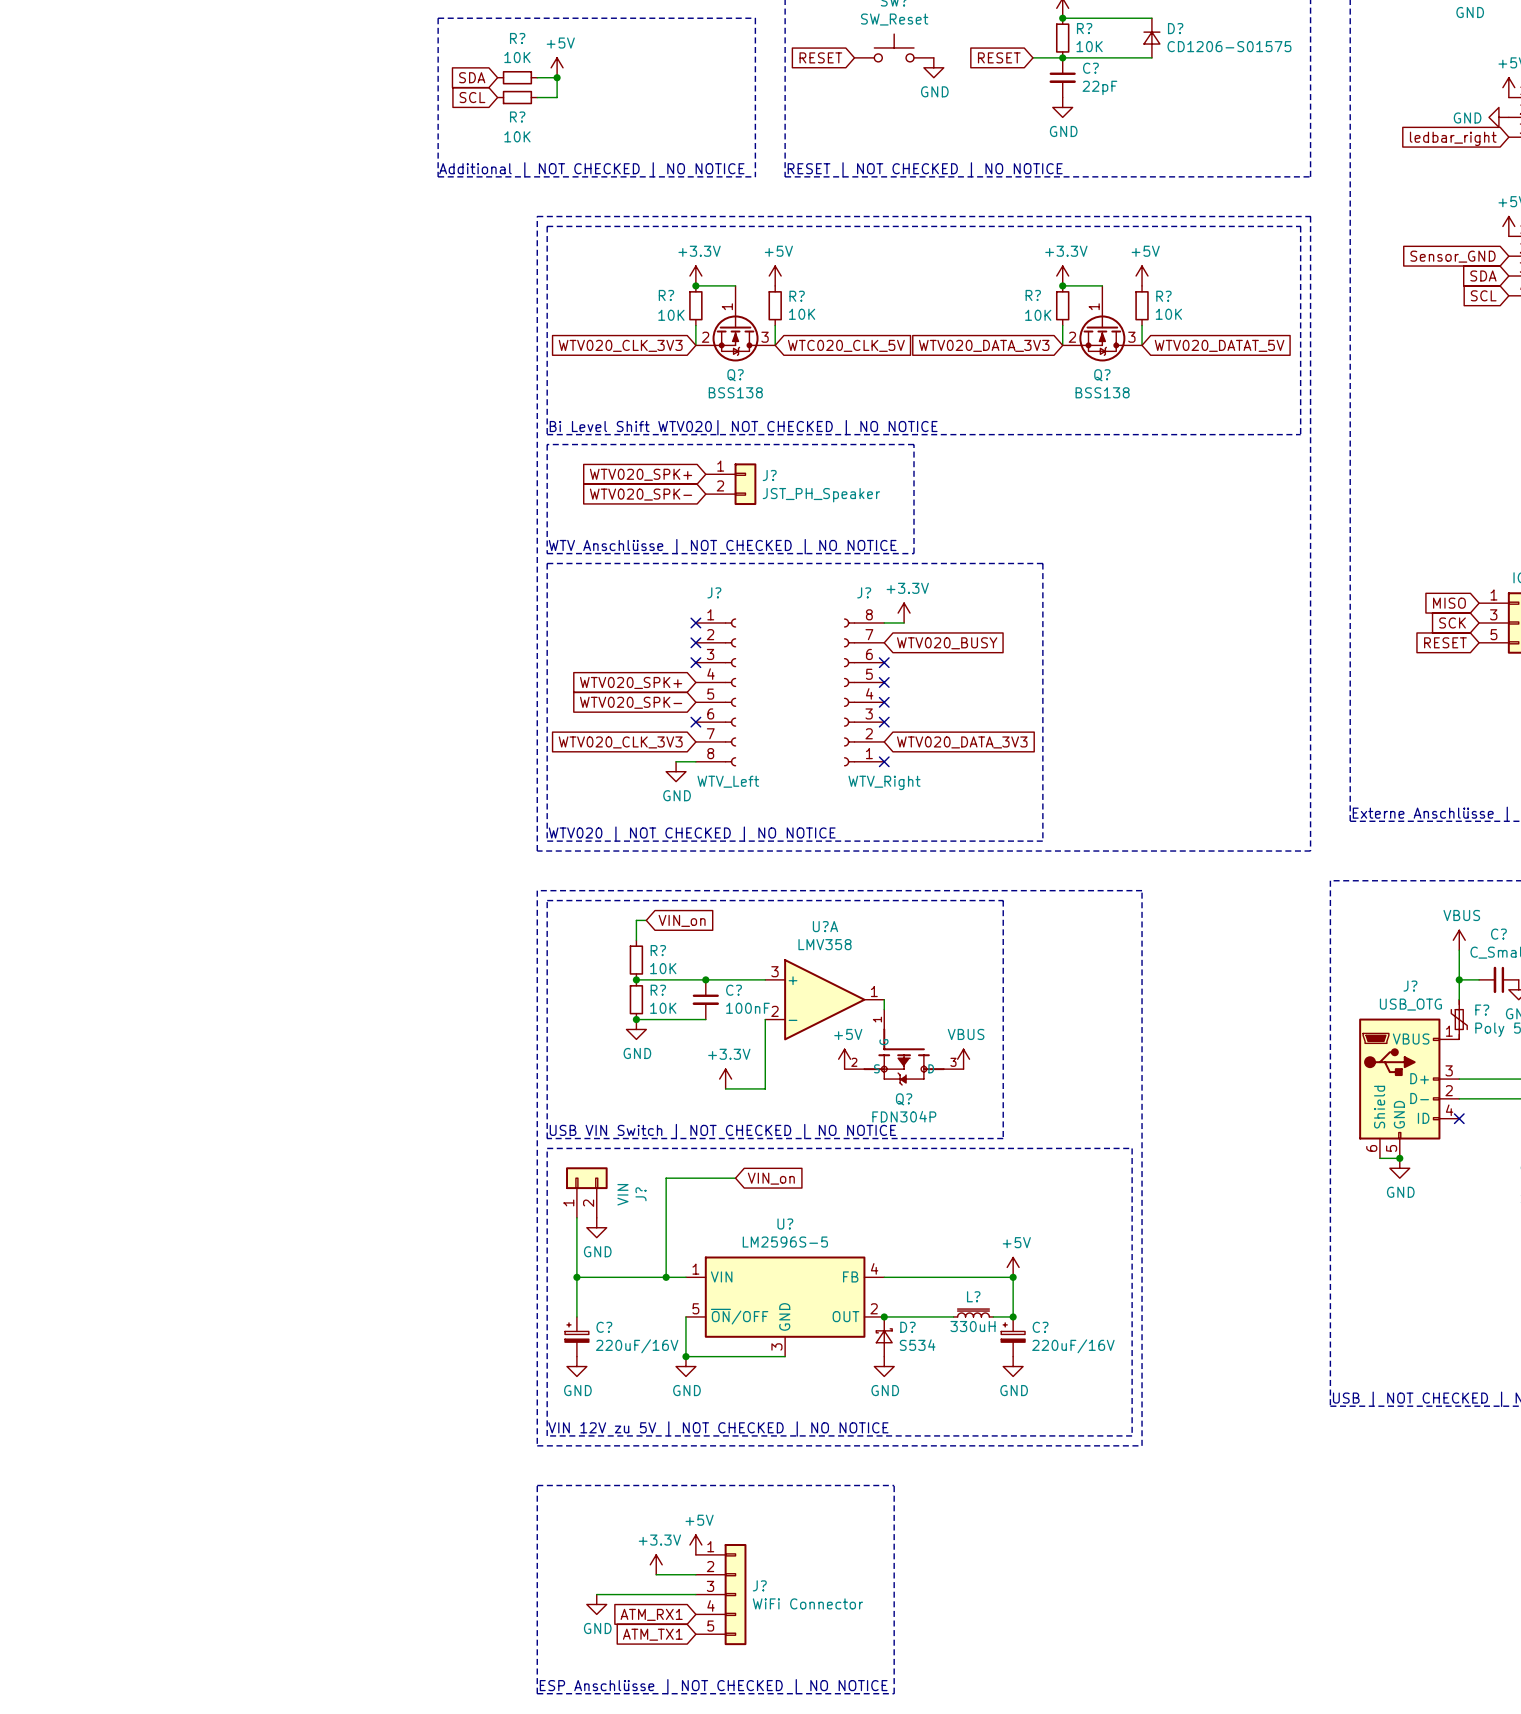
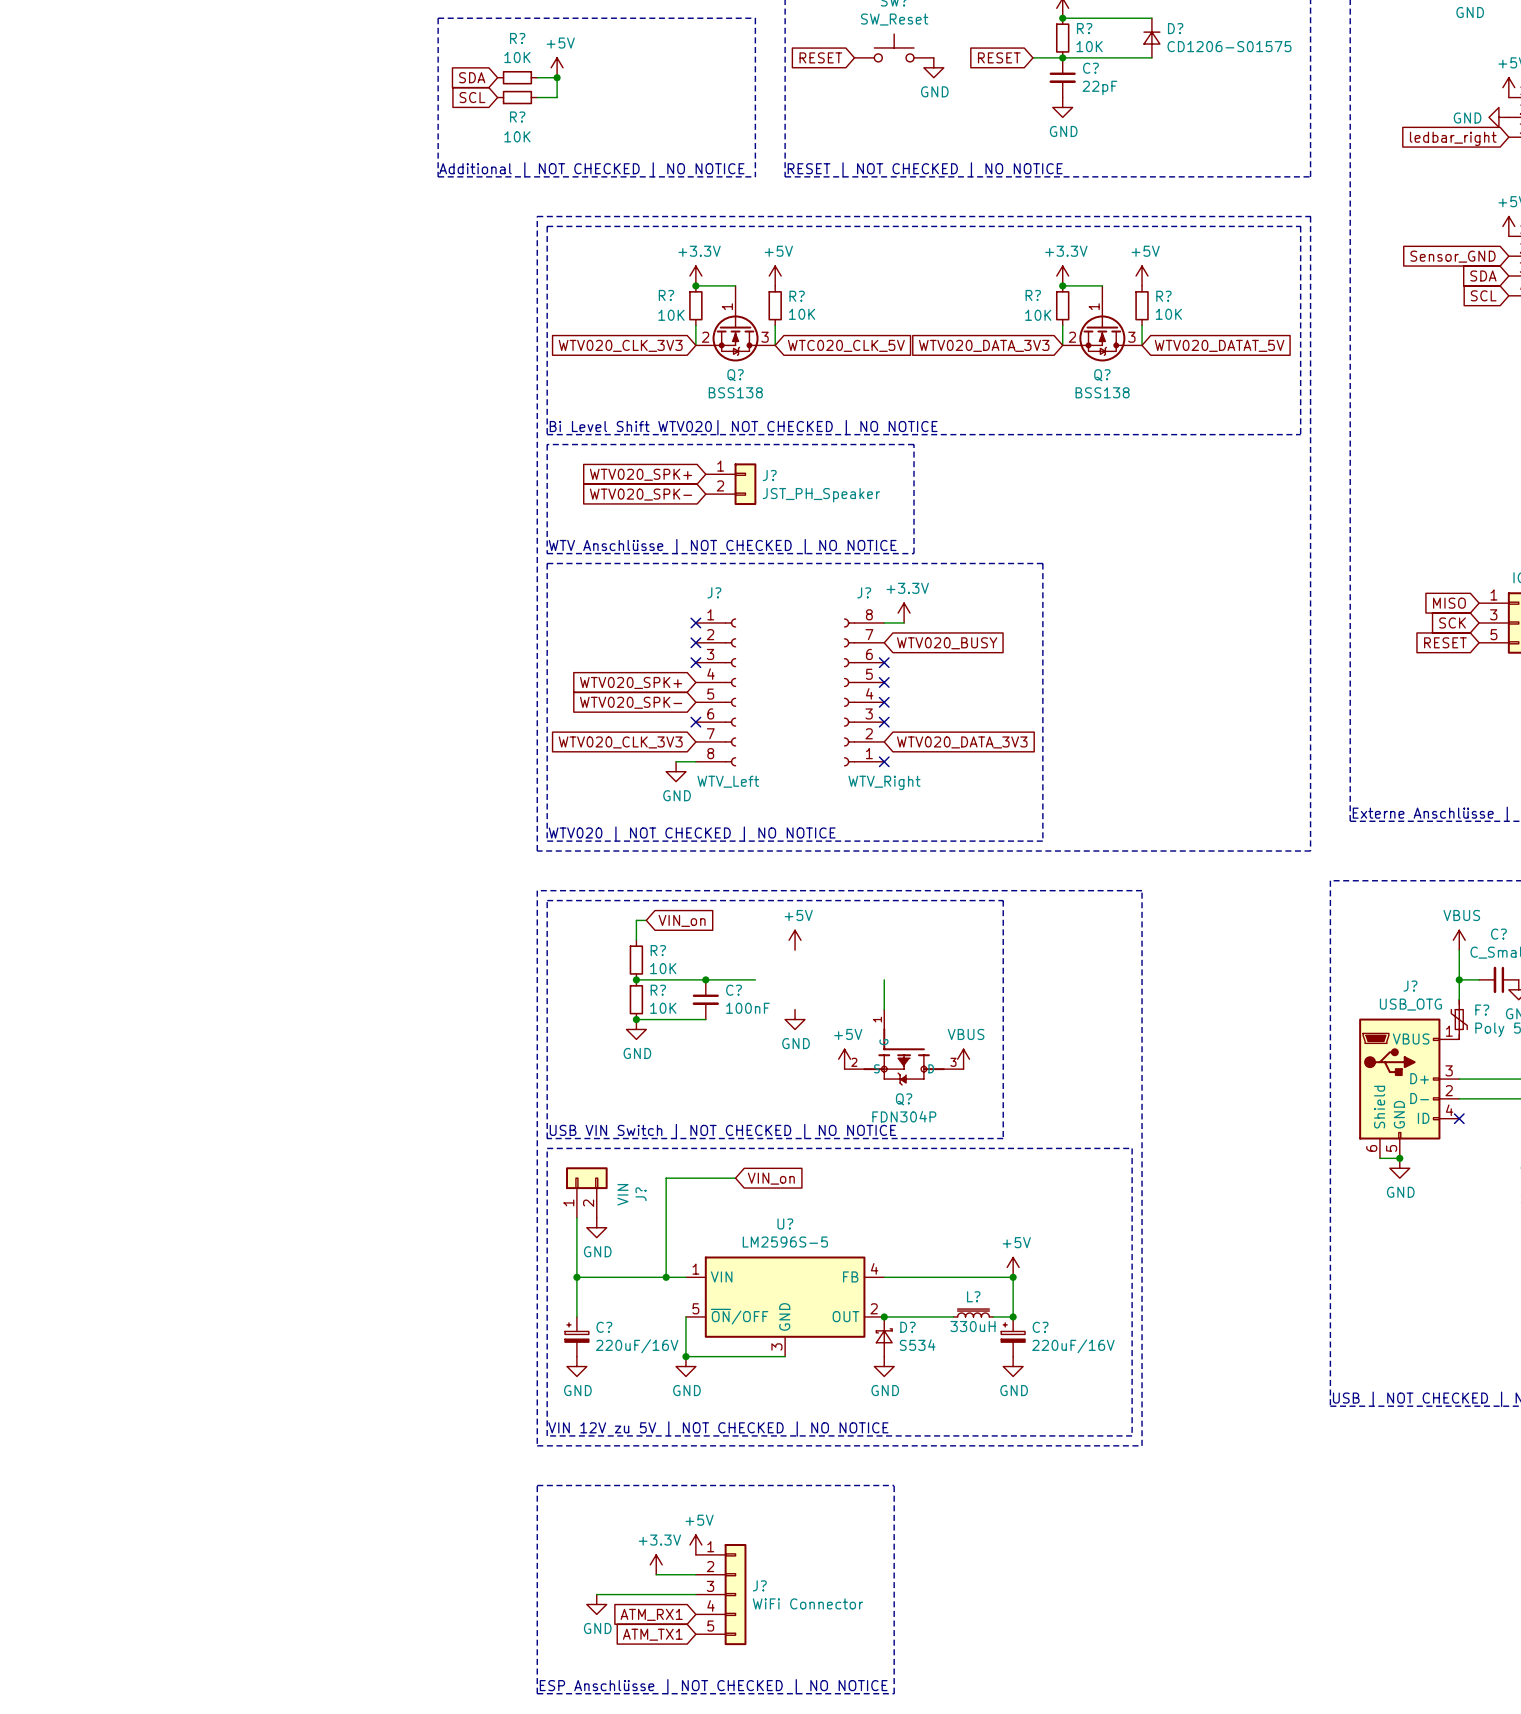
power symbol: none -> +5V (795, 940)
wire: (755, 979) (765, 979) -> none
wire: none -> (884, 979) (884, 999)
U?A: LMV358 (824, 999) -> none
wire: (765, 1019) (765, 1088) (725, 1088) -> none
power symbol: none -> GND (795, 1019)
power symbol: +3.3V (725, 1079) -> none

